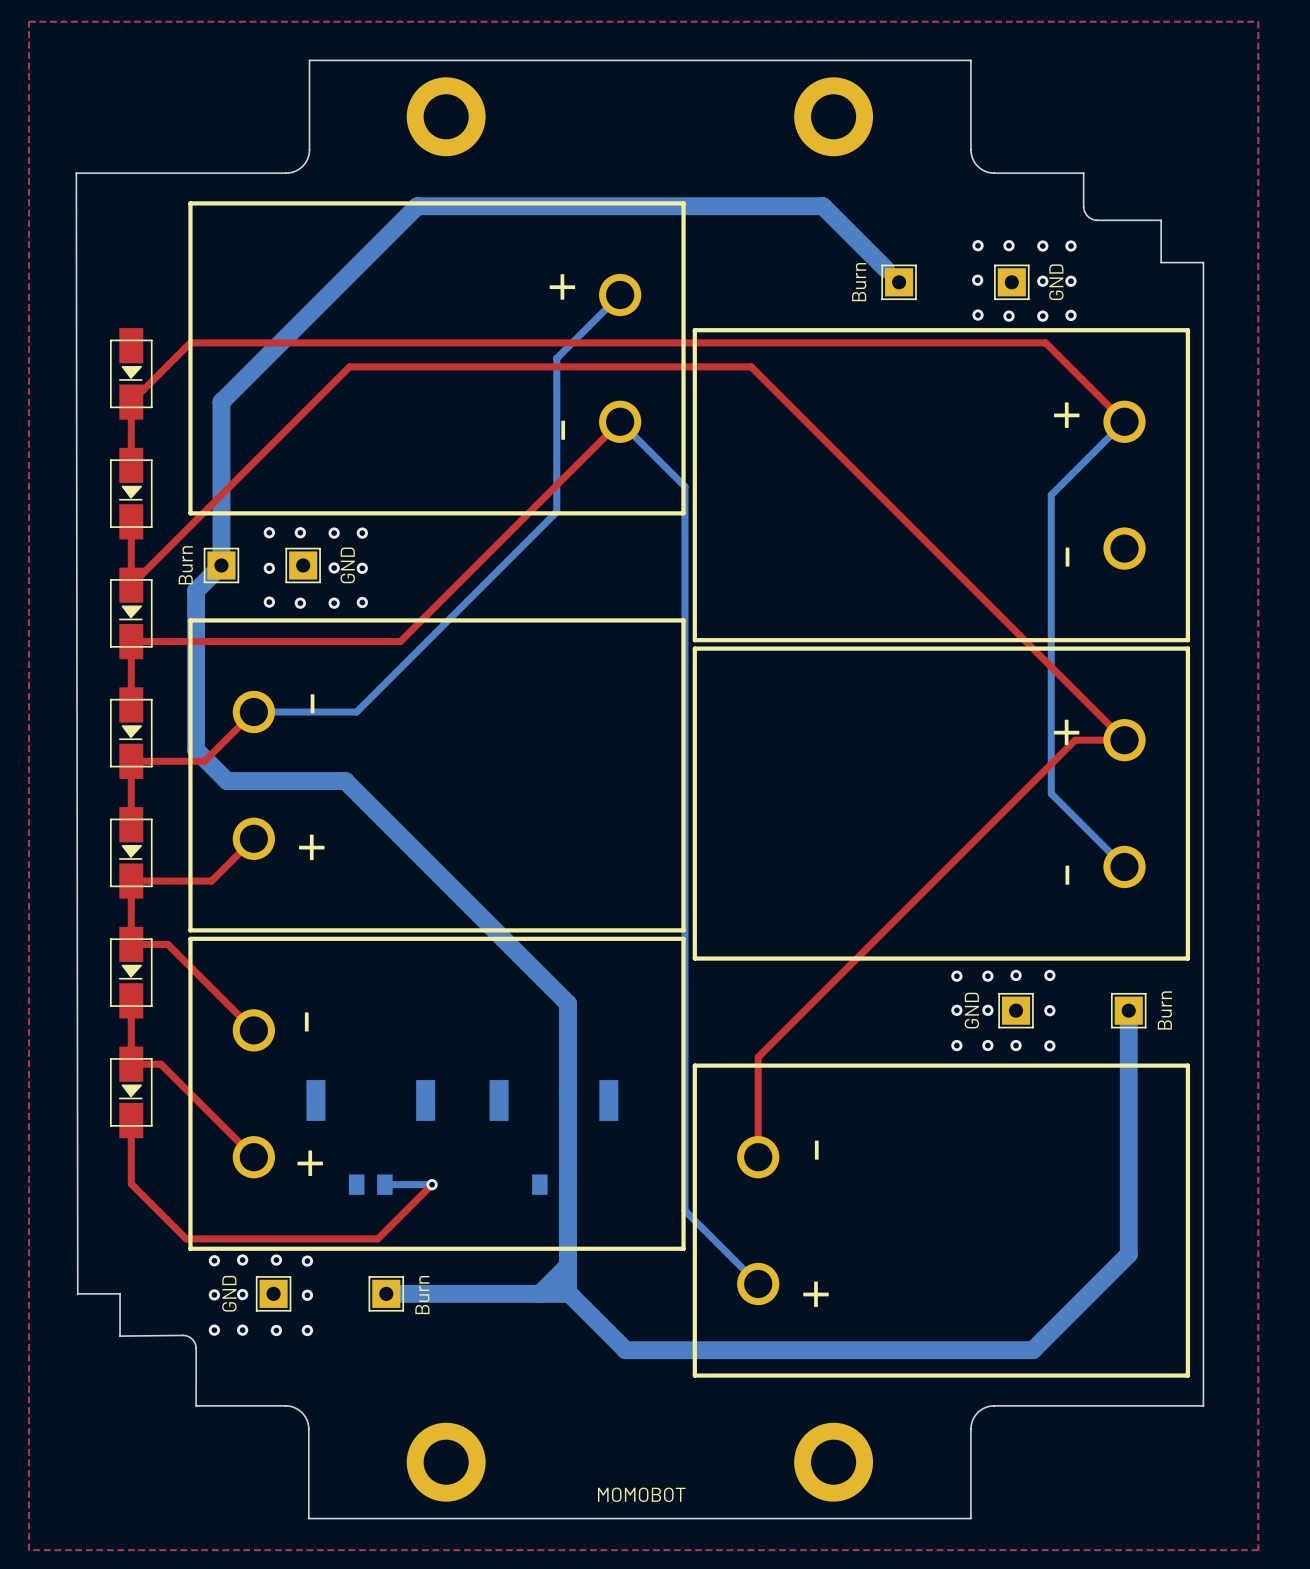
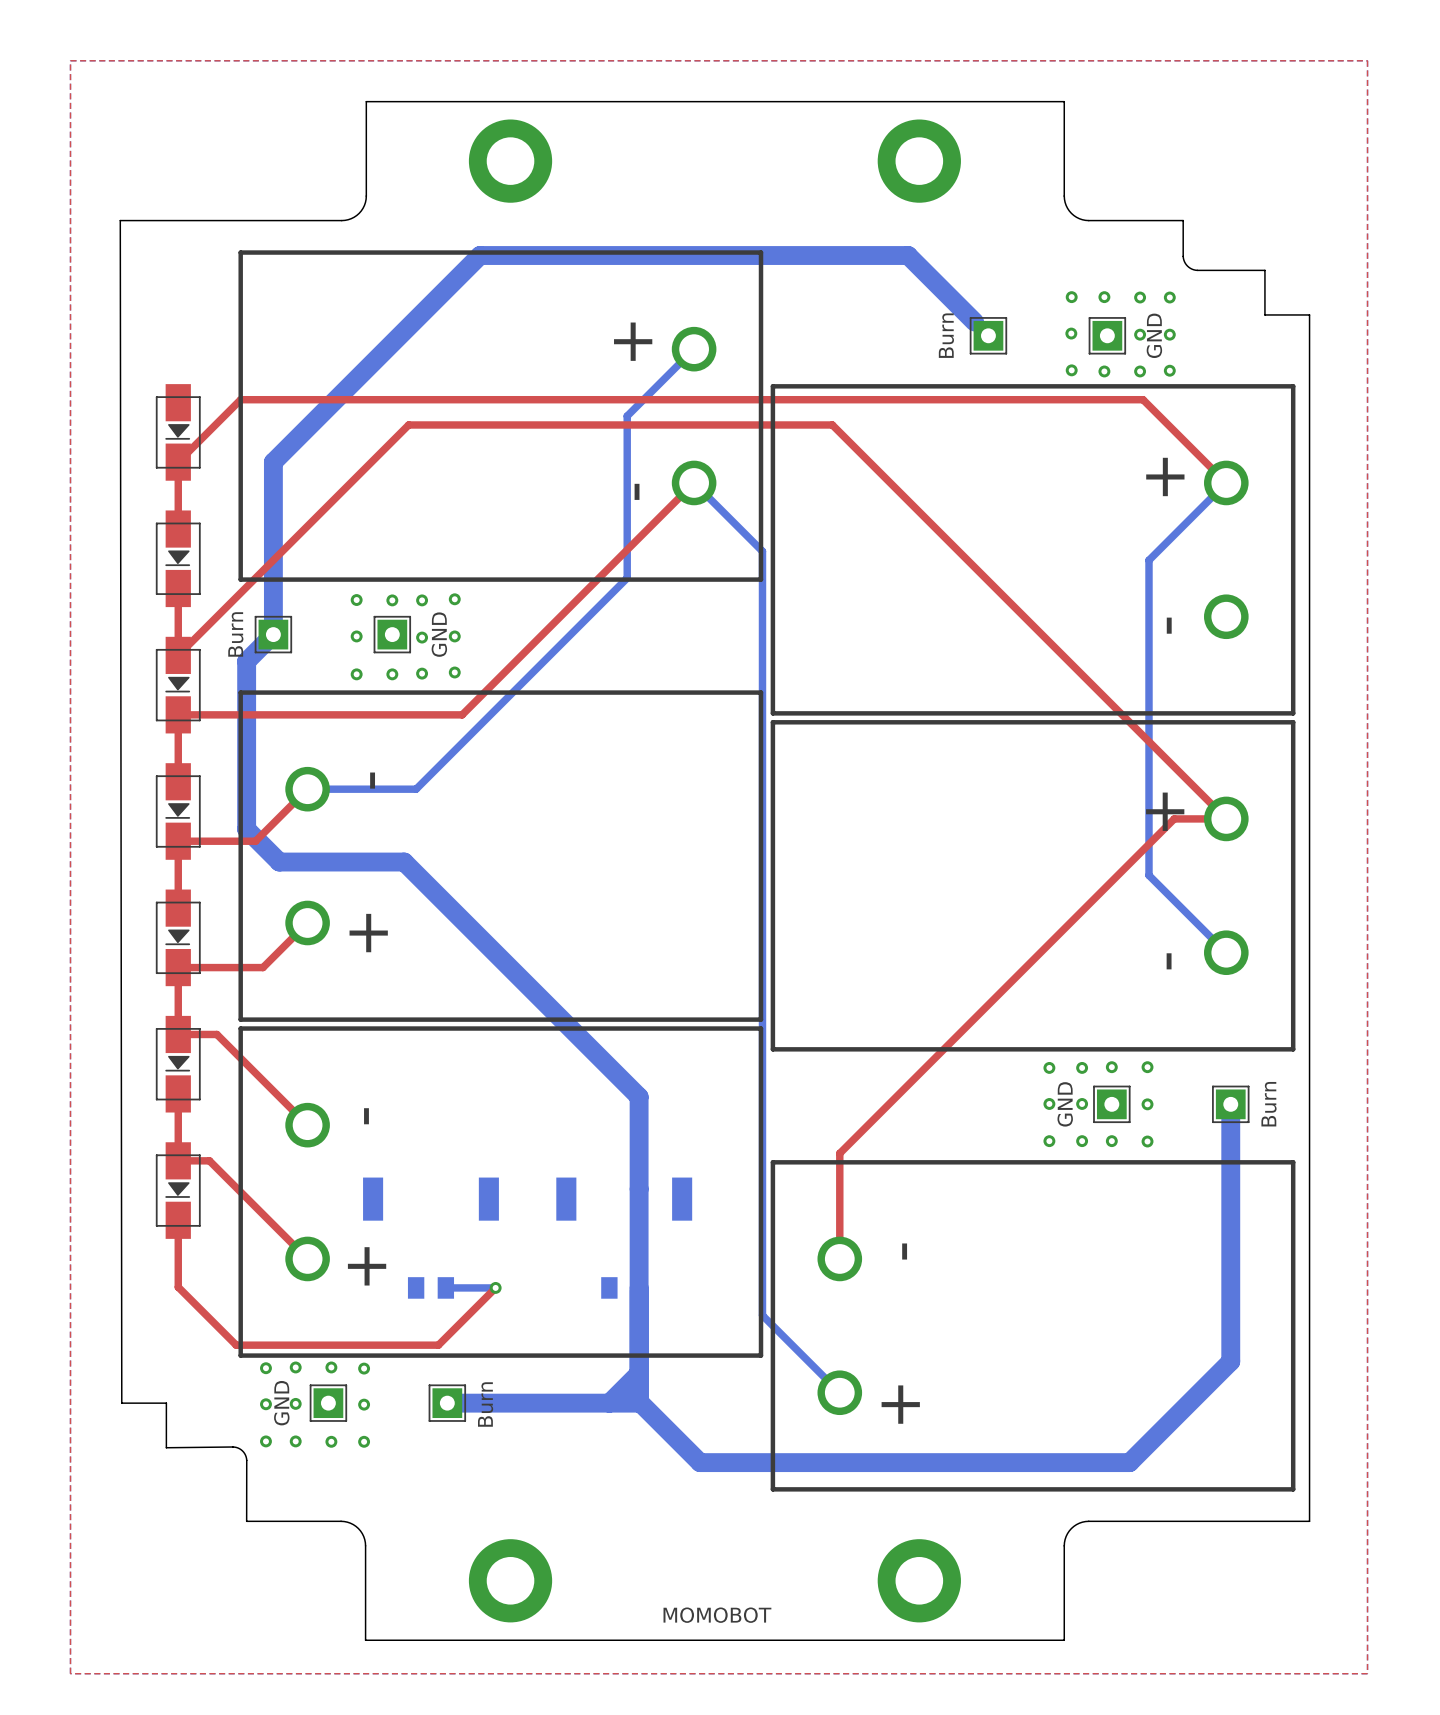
via: (269, 532) -> none
via: none -> (454, 599)
part position: (303, 565) -> (392, 634)
via: none -> (356, 636)
via: (334, 567) -> none
via: none -> (454, 636)
via: (269, 568) -> none
via: none -> (454, 672)
via: (269, 602) -> none

